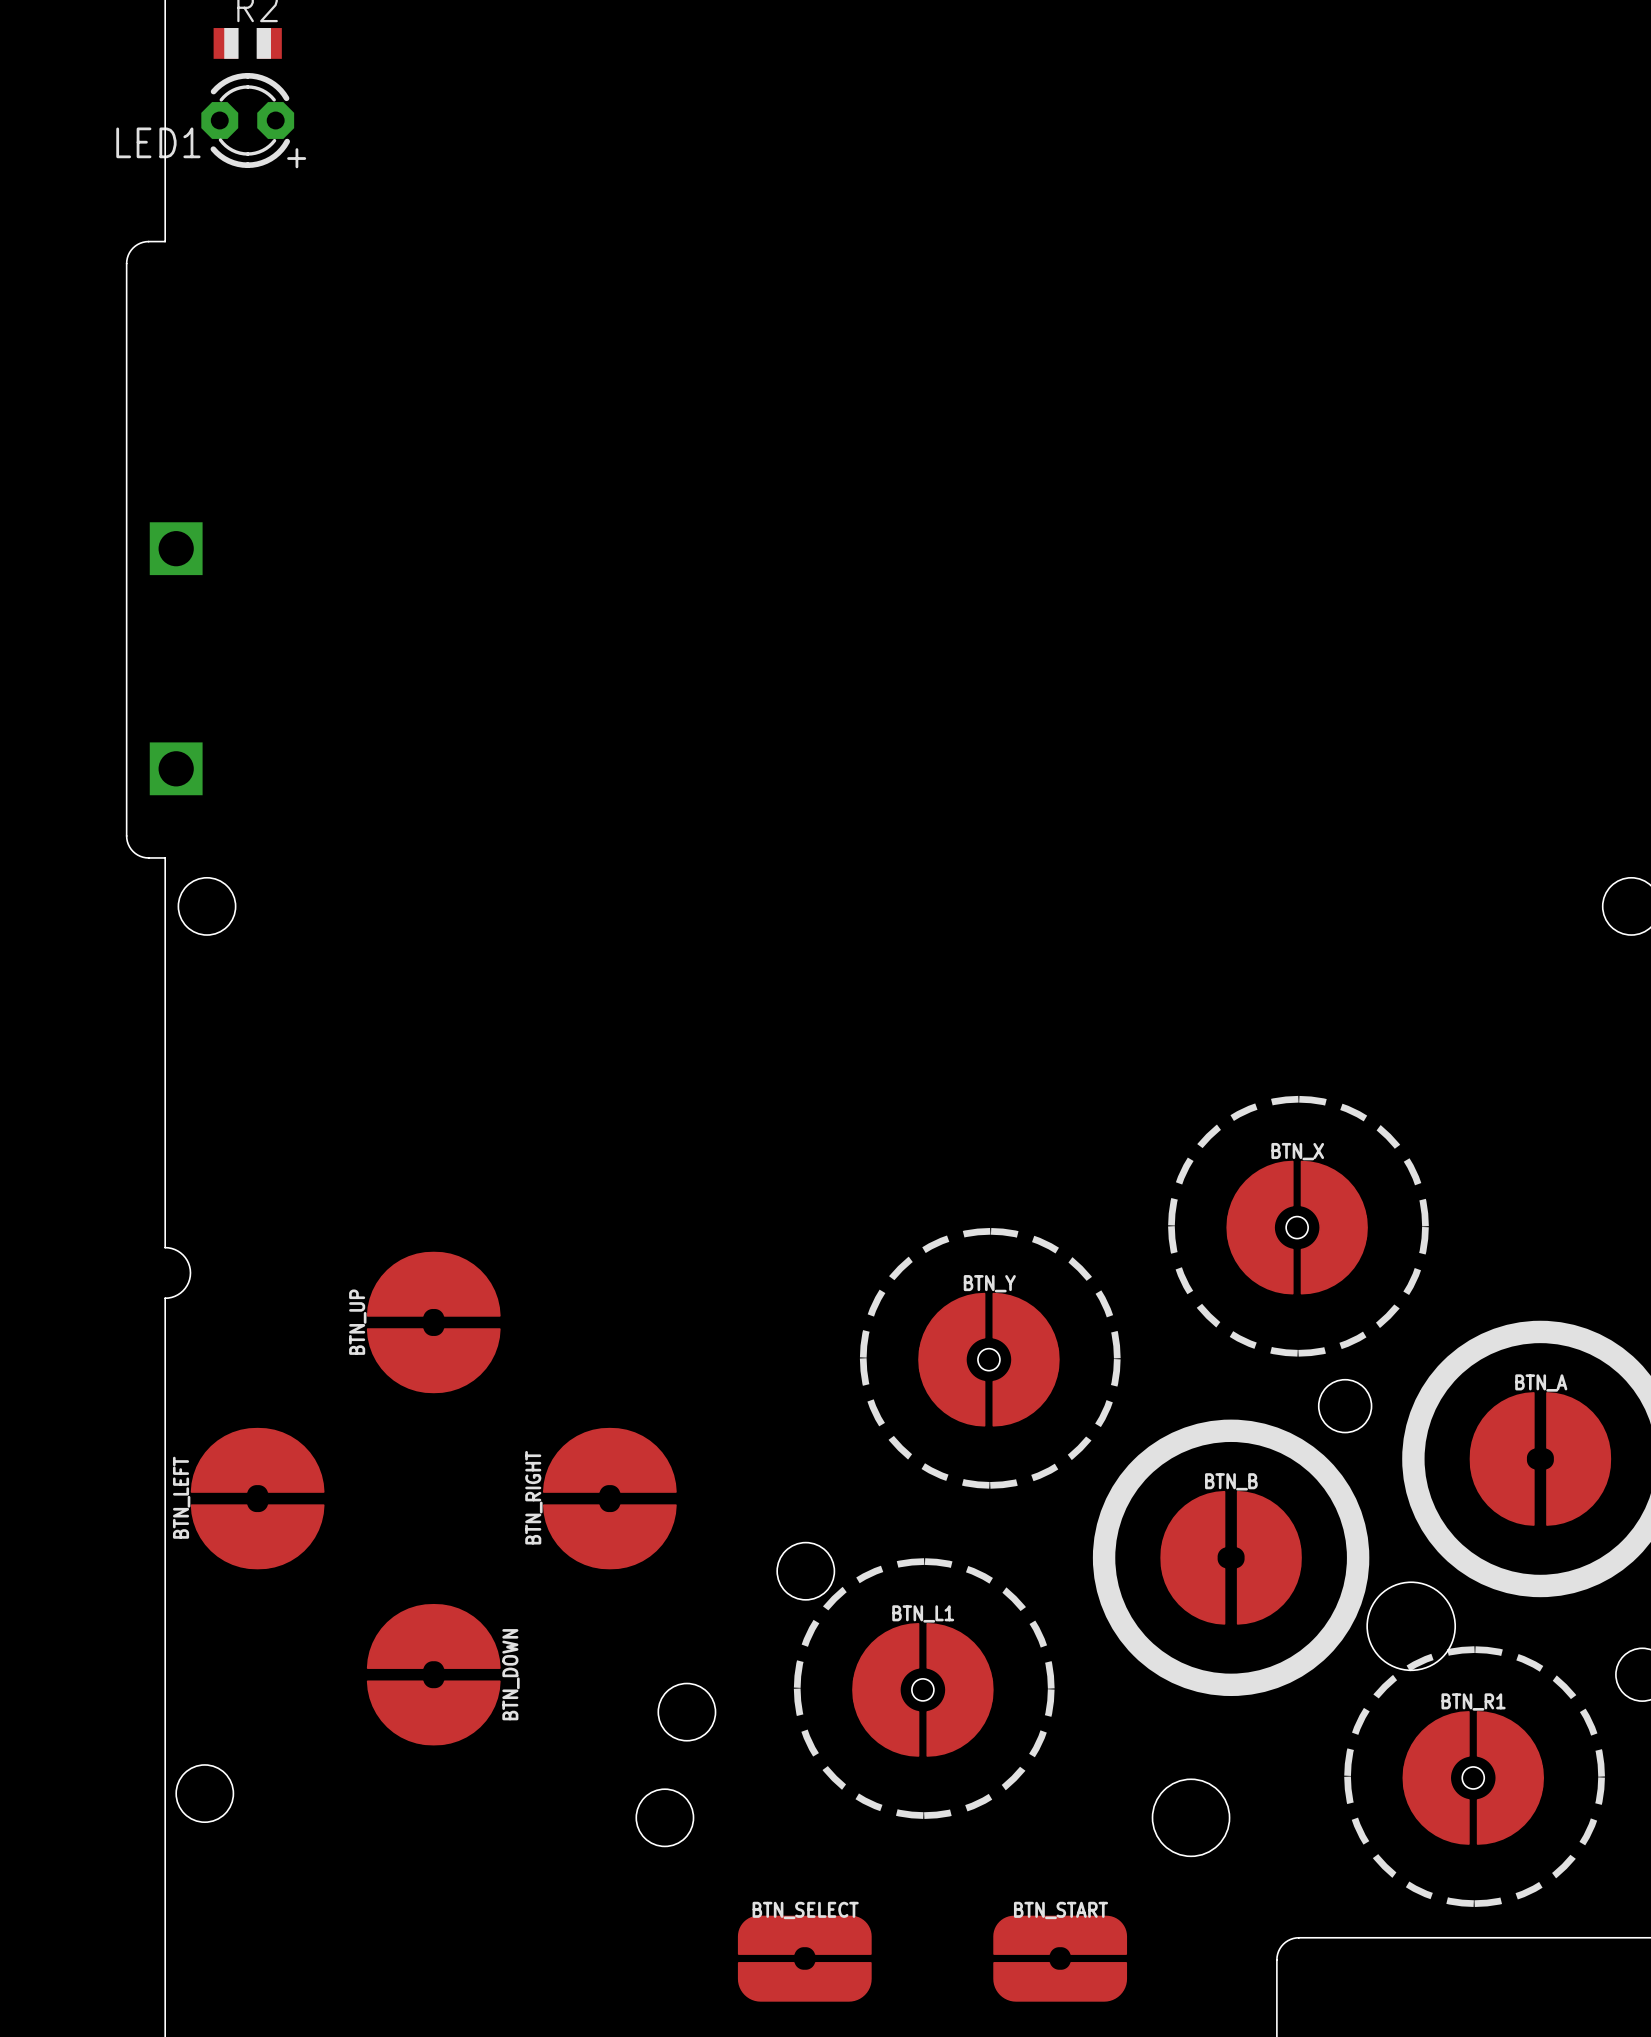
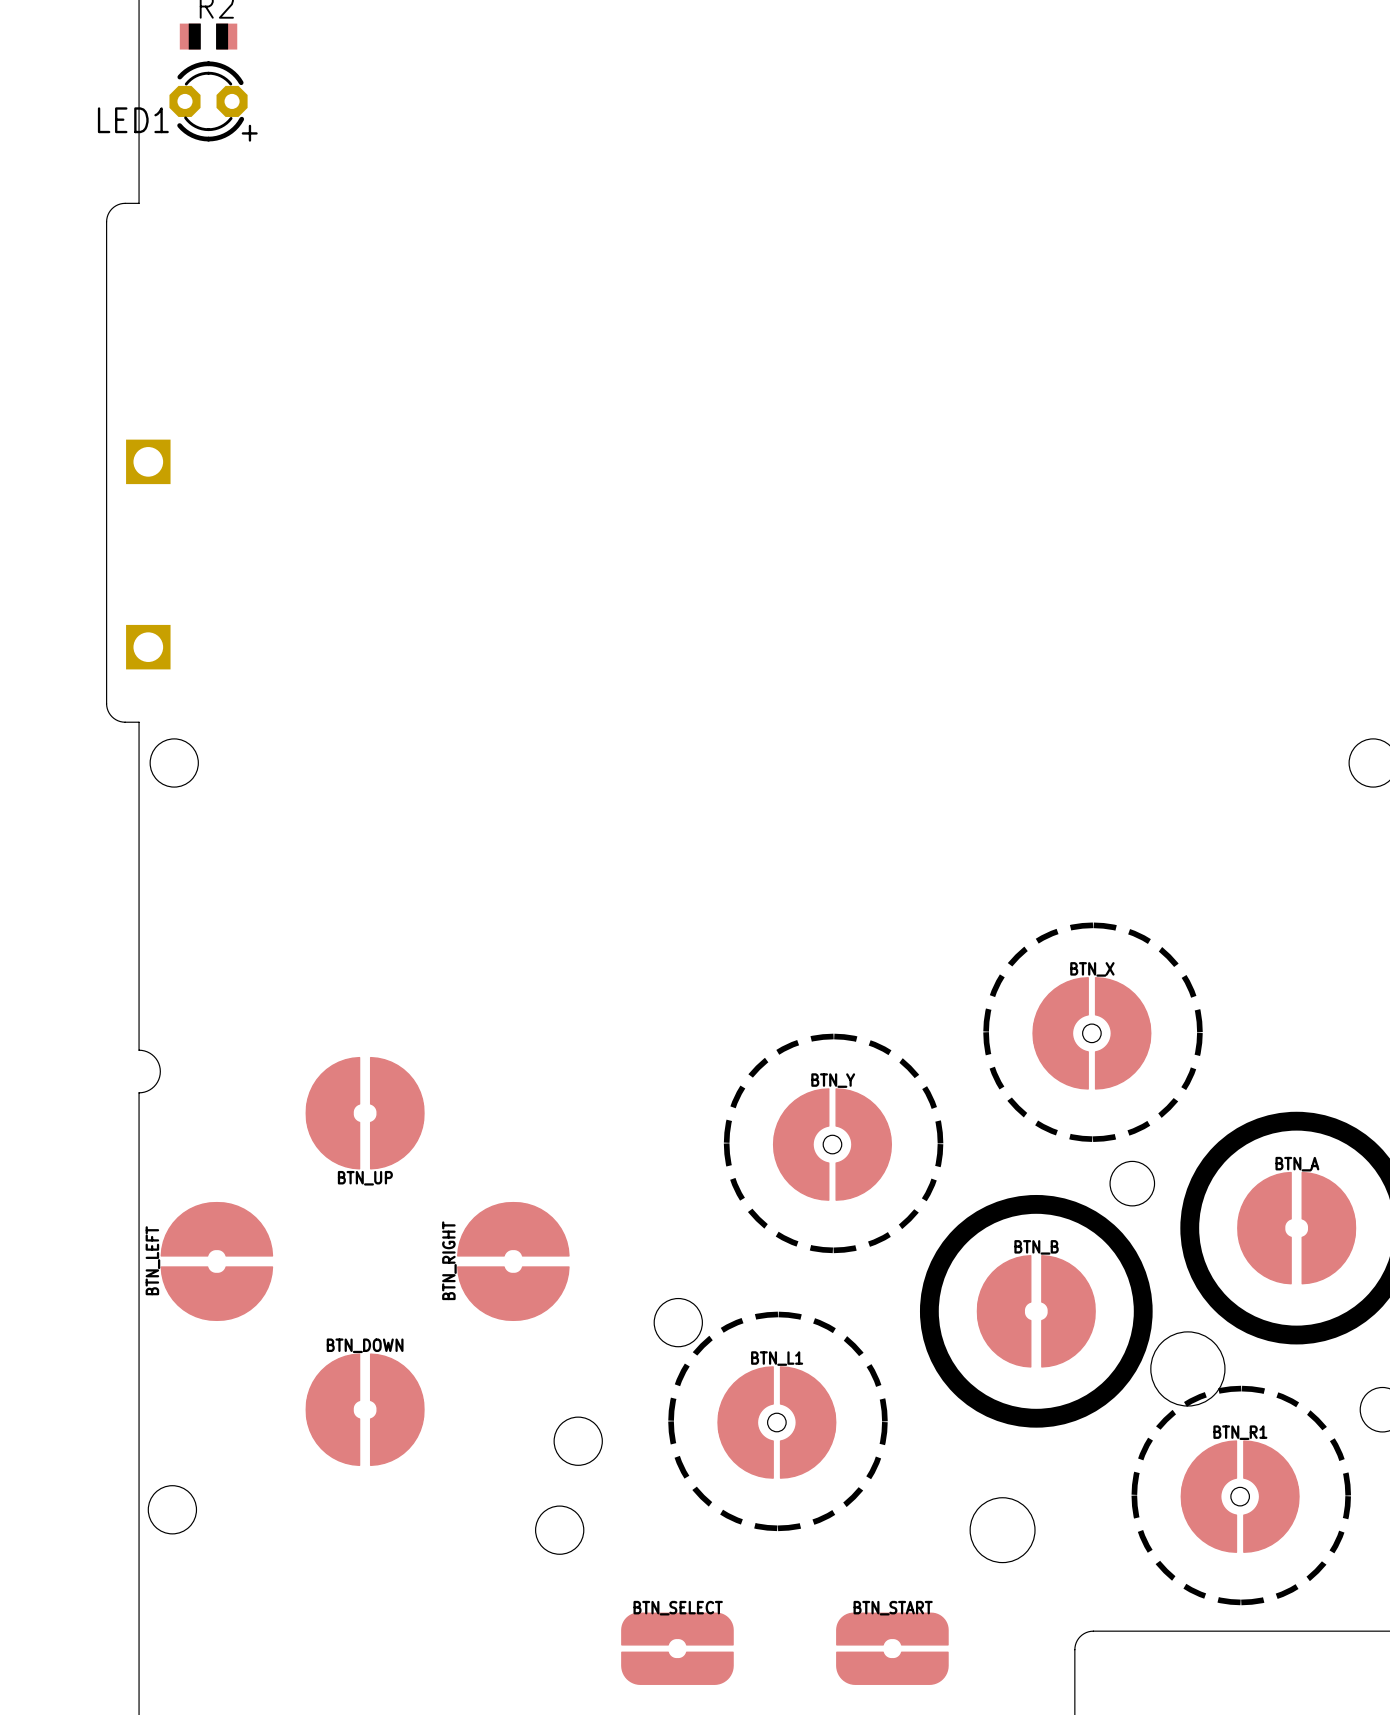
BTN_UP name position: BTN_UP (357, 1322) -> BTN_UP (365, 1178)
BTN_UP rotation: 0° (433, 1322) -> 90° clockwise (365, 1113)
BTN_DOWN rotation: 0° (433, 1674) -> 90° clockwise (365, 1409)
BTN_DOWN name position: BTN_DOWN (510, 1674) -> BTN_DOWN (365, 1345)

